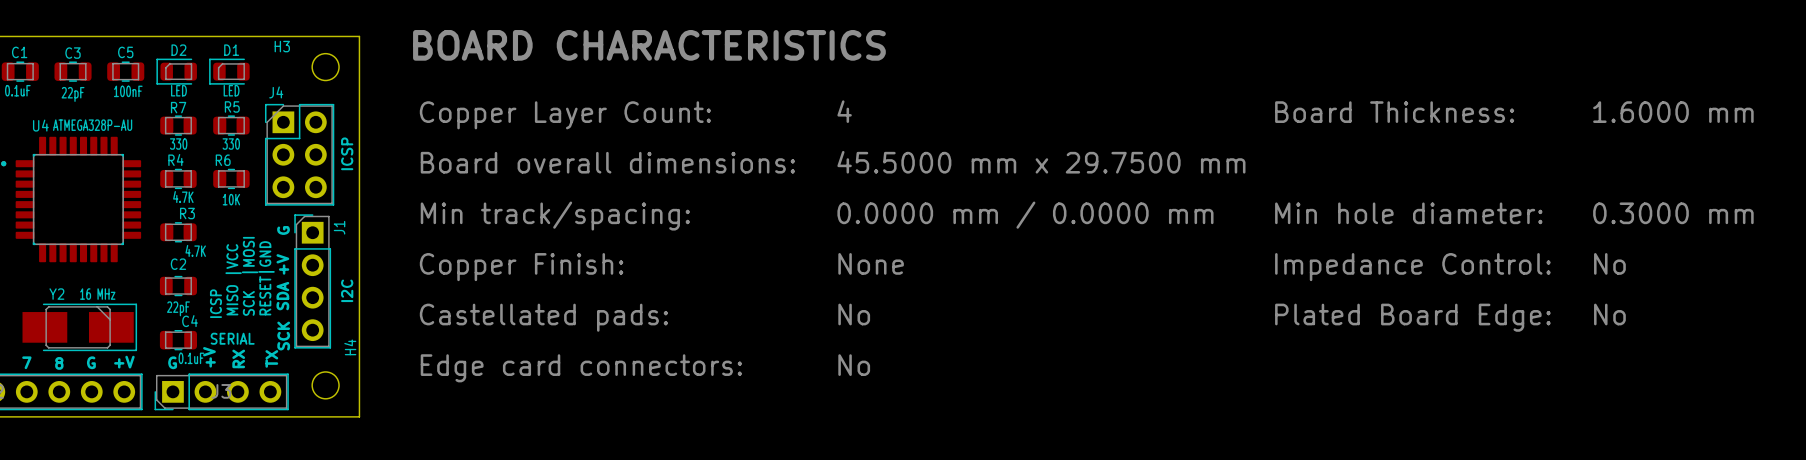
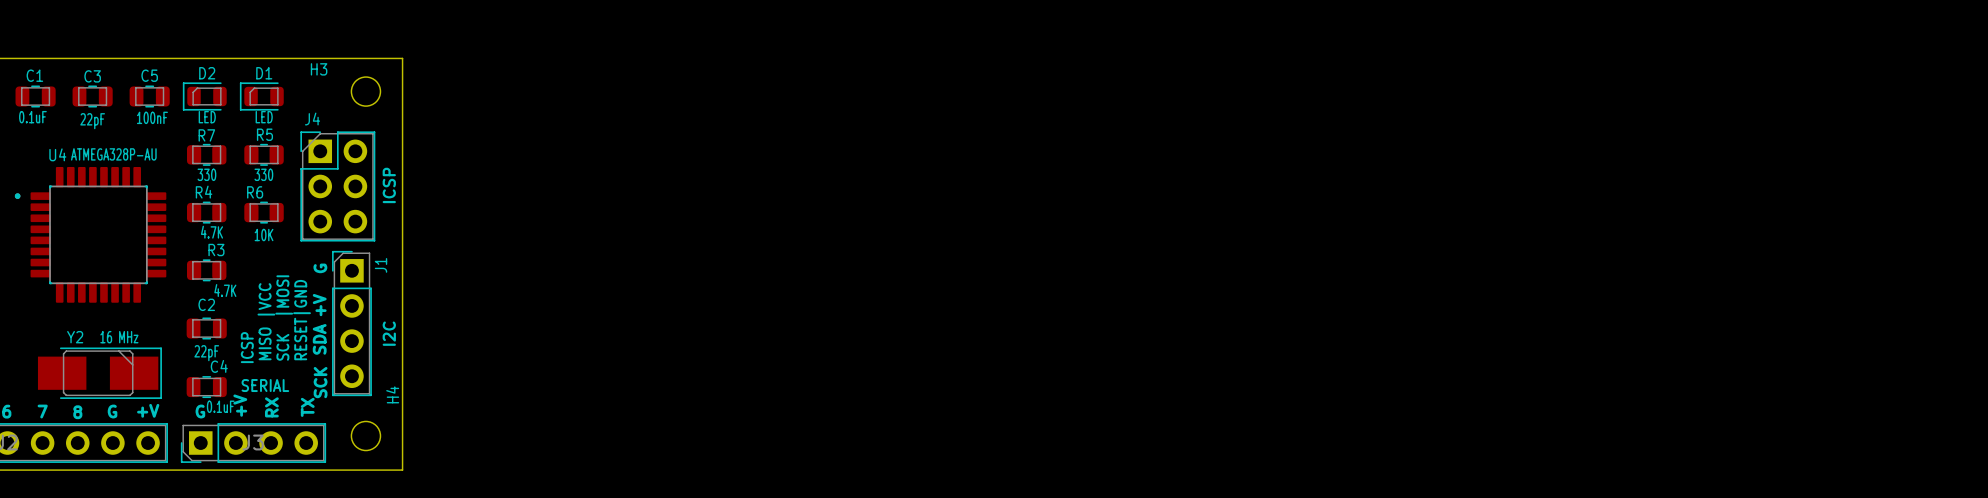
text: BOARD CHARACTERISTICS (649, 45) -> none
text: 4 (844, 111) -> none
text: Board Thickness: (1394, 112) -> none
text: 1.6000 mm (1673, 112) -> none
text: Copper Layer Count: (565, 115) -> none
text: Board overall dimensions: (607, 162) -> none
text: 45.5000 mm x 29.7500 mm (1041, 162) -> none
text: Min hole diameter: (1408, 213) -> none
text: 0.3000 mm (1673, 213) -> none
text: 0.0000 mm / 0.0000 mm (1025, 215) -> none
text: Min track/spacing: (555, 216) -> none
text: None (871, 263) -> none
text: No (1609, 263) -> none
text: Copper Finish: (521, 267) -> none
text: Impedance Control: (1412, 267) -> none
text: No (854, 314) -> none
text: No (1609, 314) -> none
text: Castellated pads: (543, 317) -> none
text: Plated Board Edge: (1412, 317) -> none
text: No (854, 365) -> none
text: Edge card connectors: (581, 368) -> none

